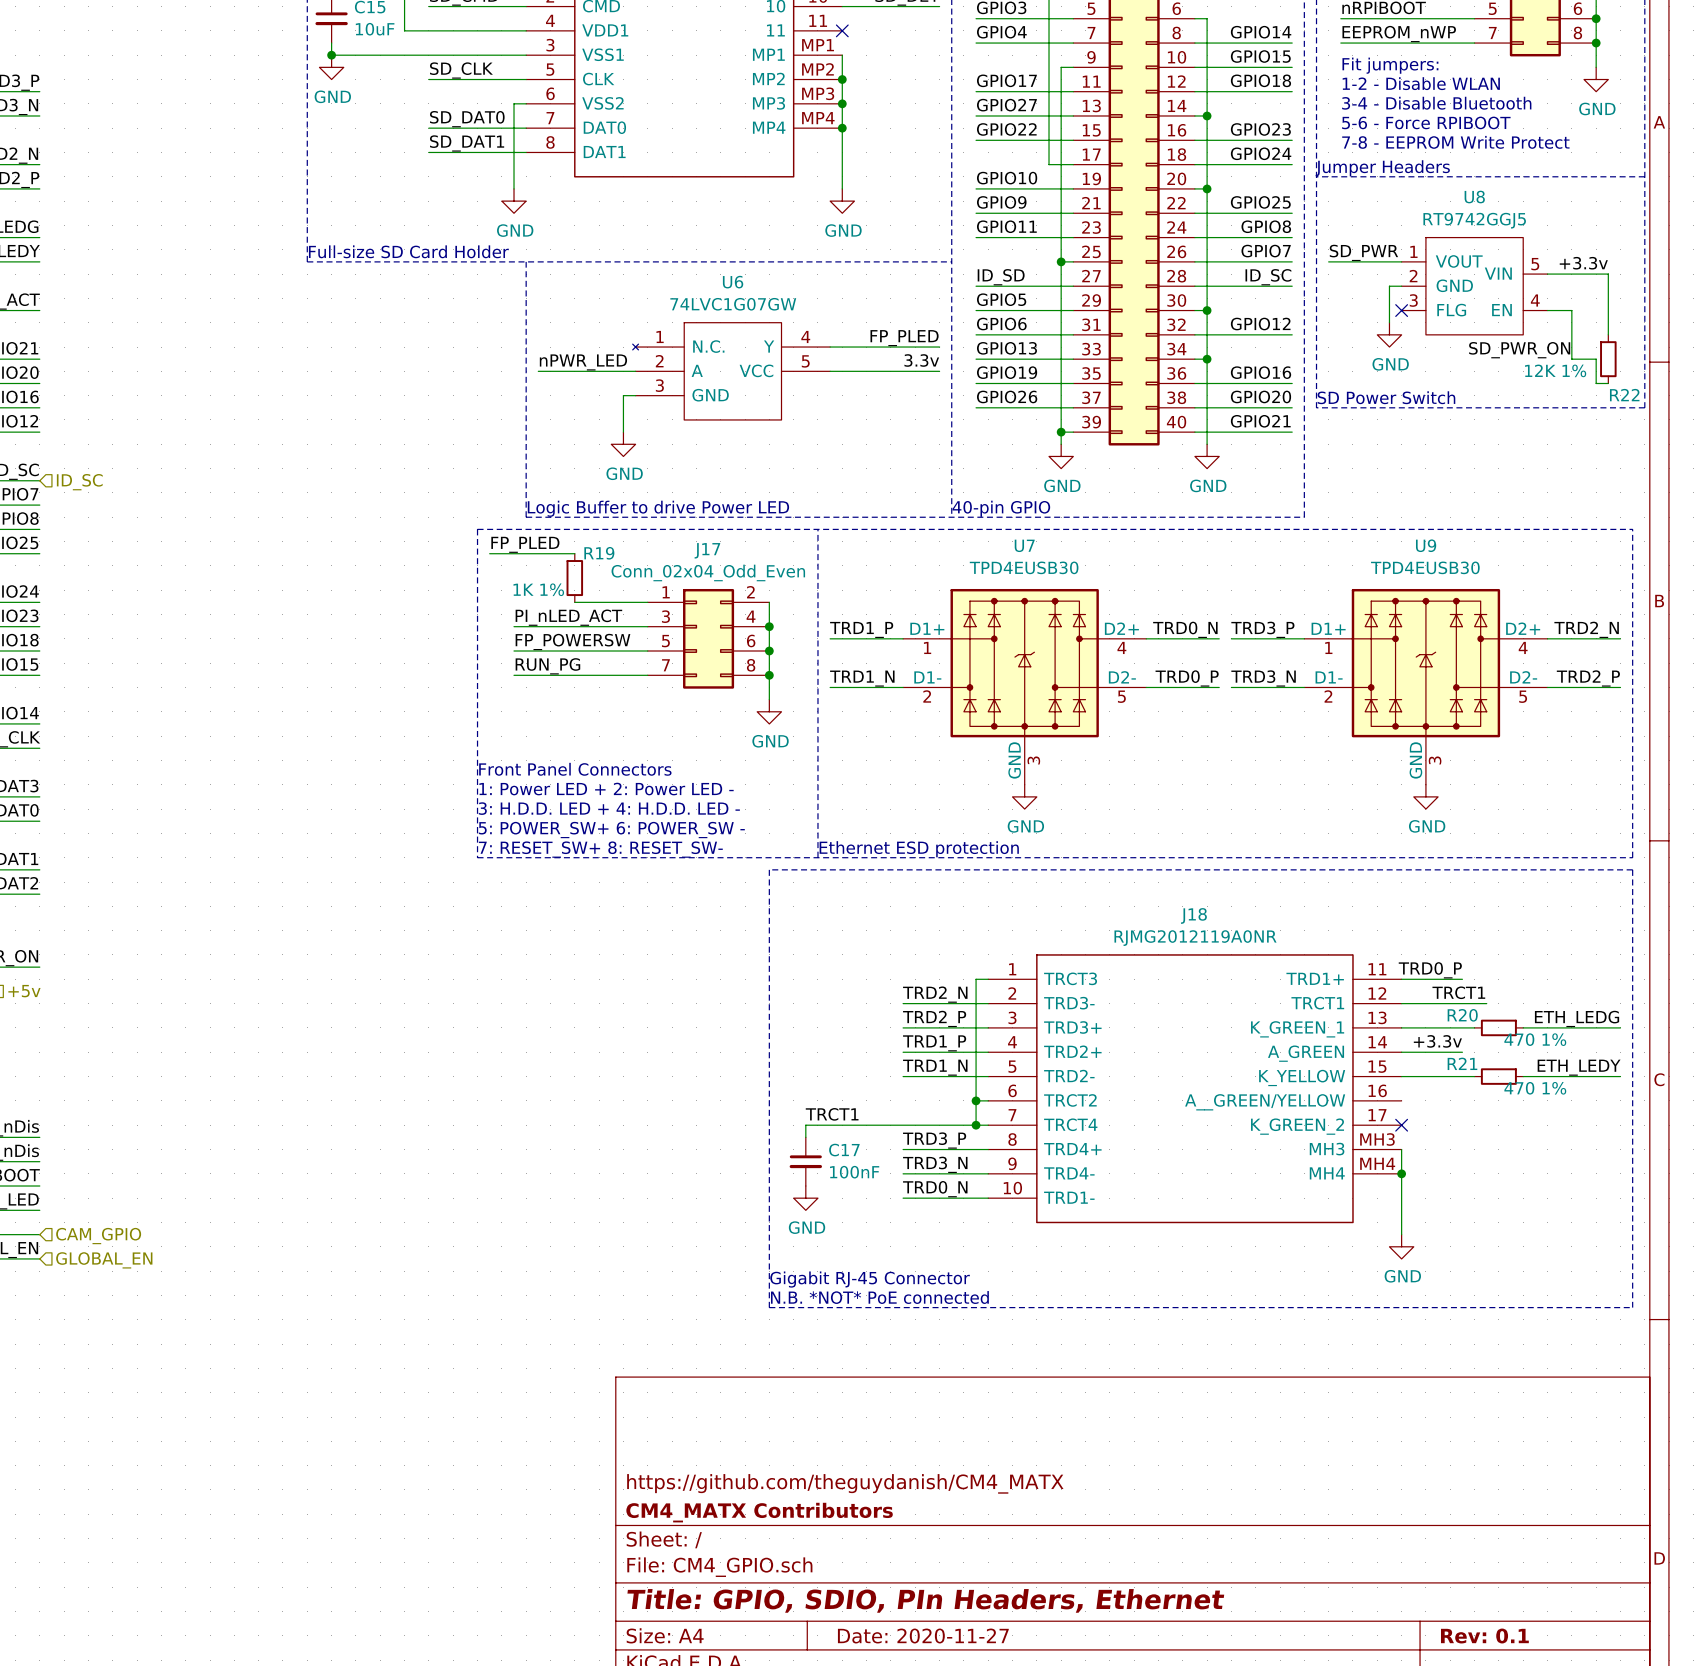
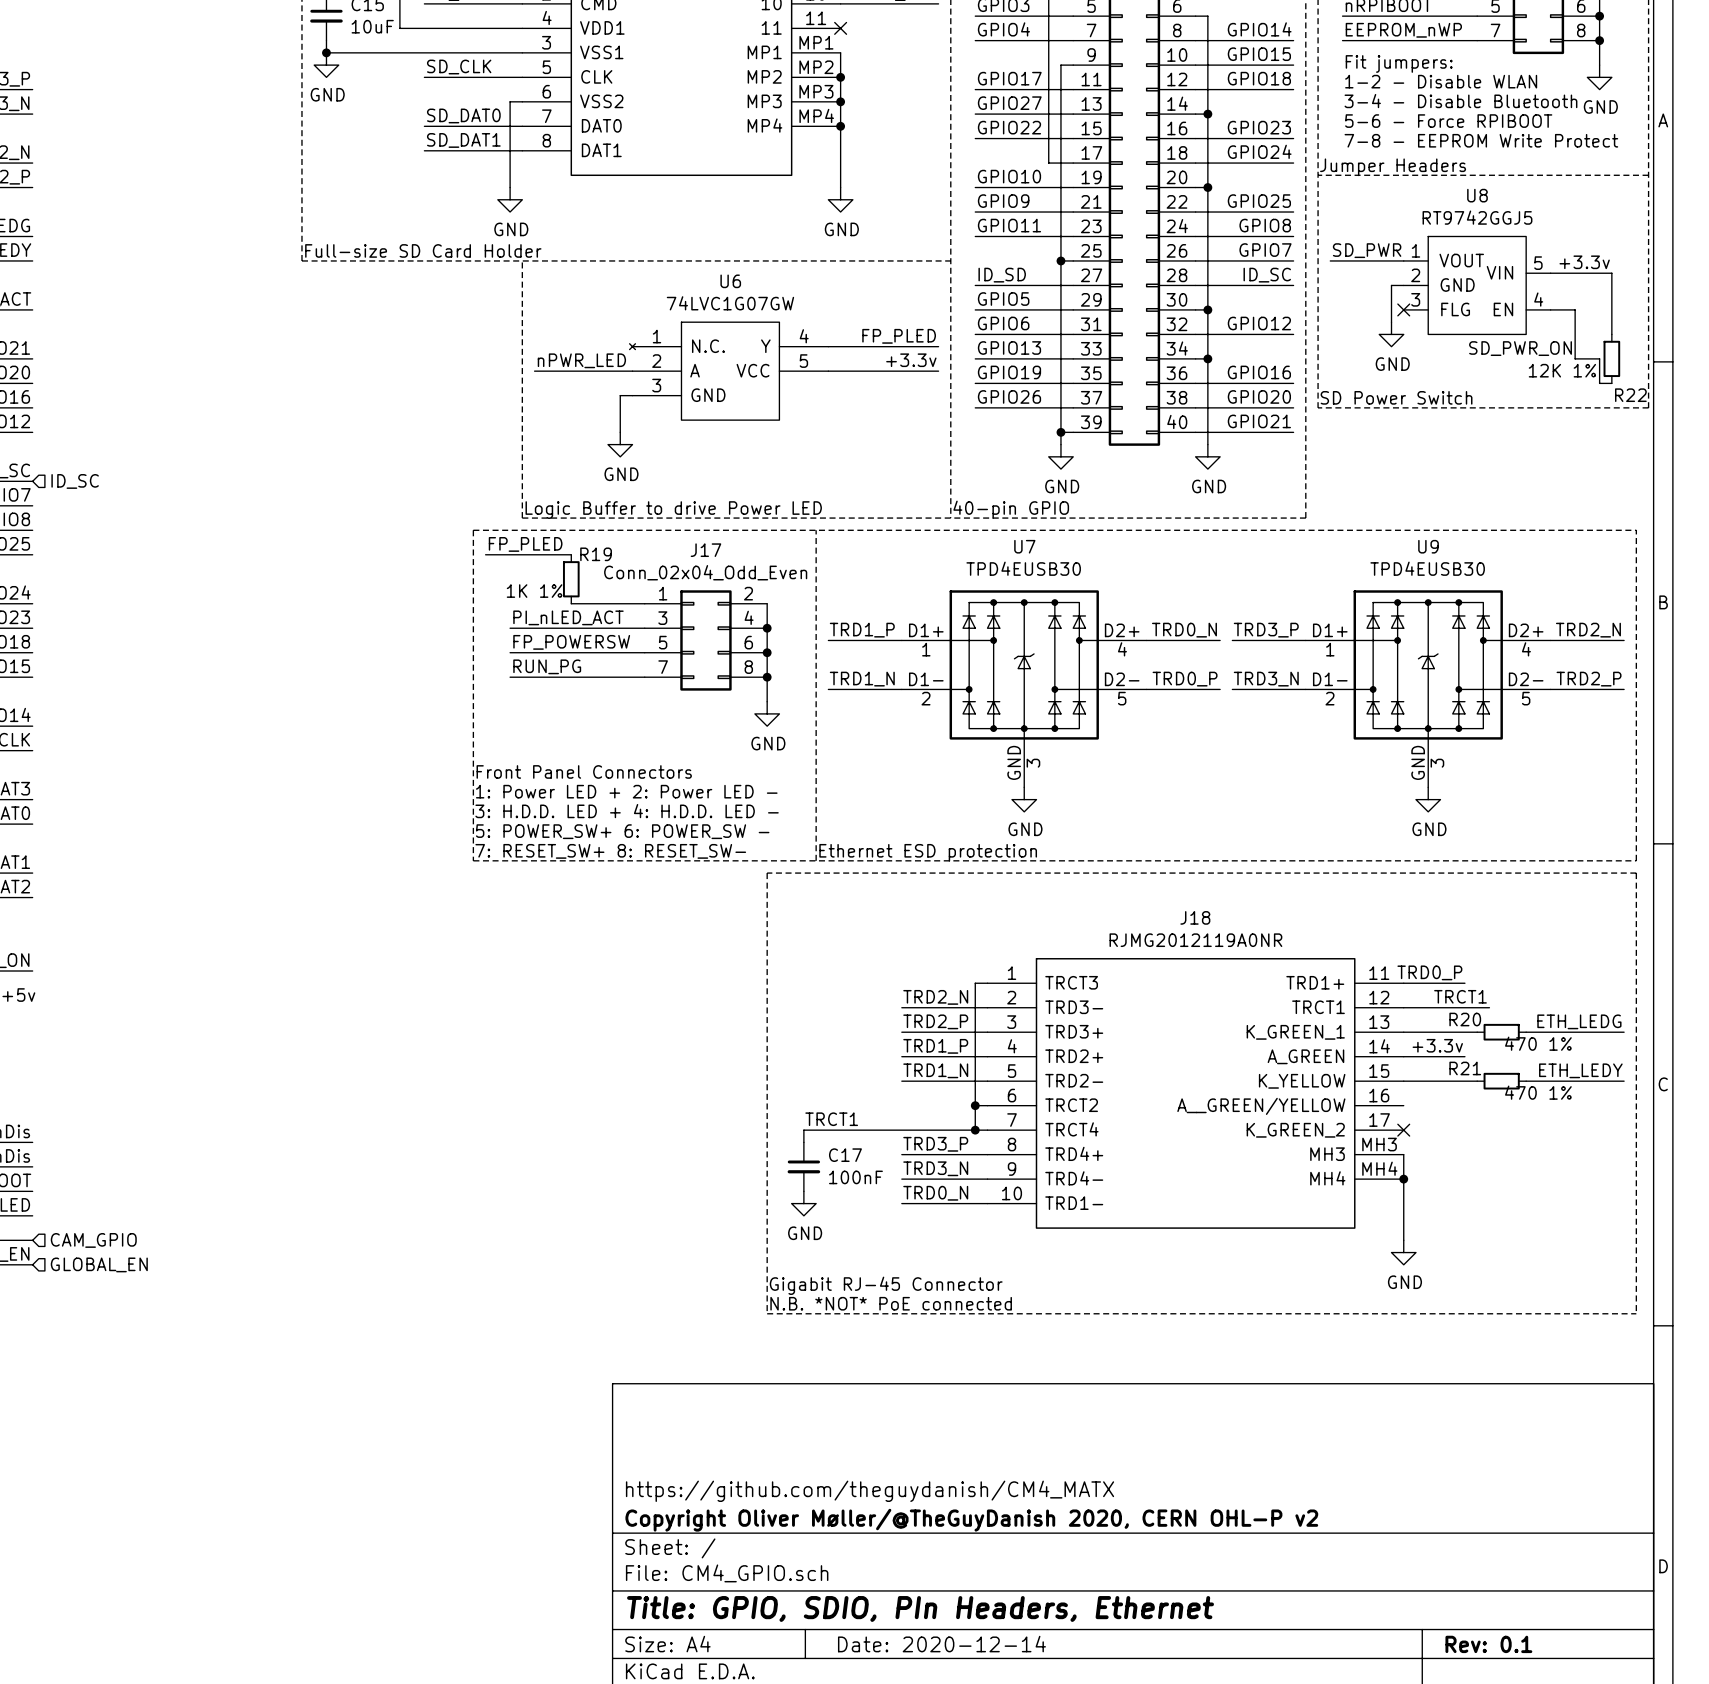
label: 3.3v (921, 360) -> +3.3v (911, 360)
title block: CM4_MATX Contributors (759, 1512) -> Copyright Oliver Møller/@TheGuyDanish 2020, CERN OHL-P v2 (971, 1520)
title block: Date: 2020-11-27 (923, 1636) -> Date: 2020-12-14 (941, 1644)

